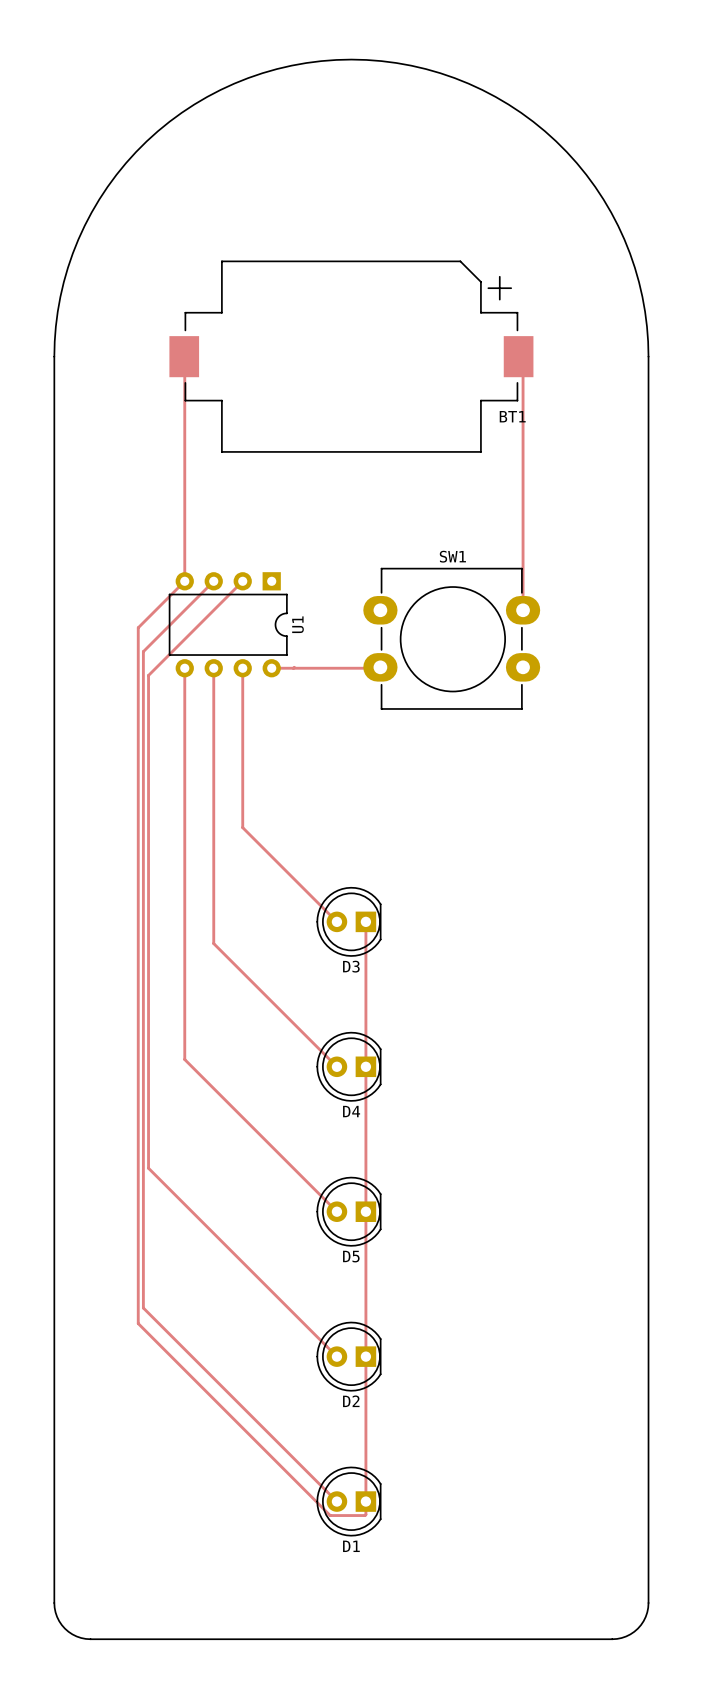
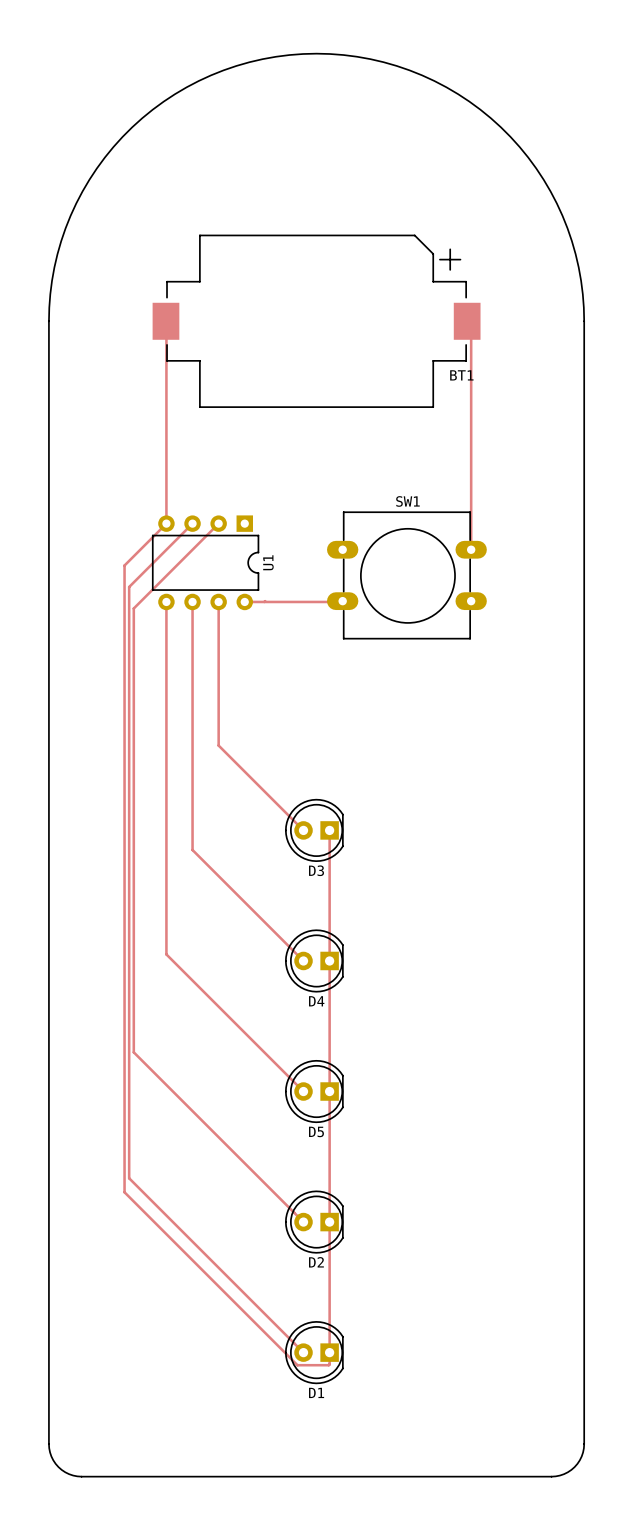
SW1 footprint: [363, 567, 541, 710] -> [327, 511, 487, 640]

